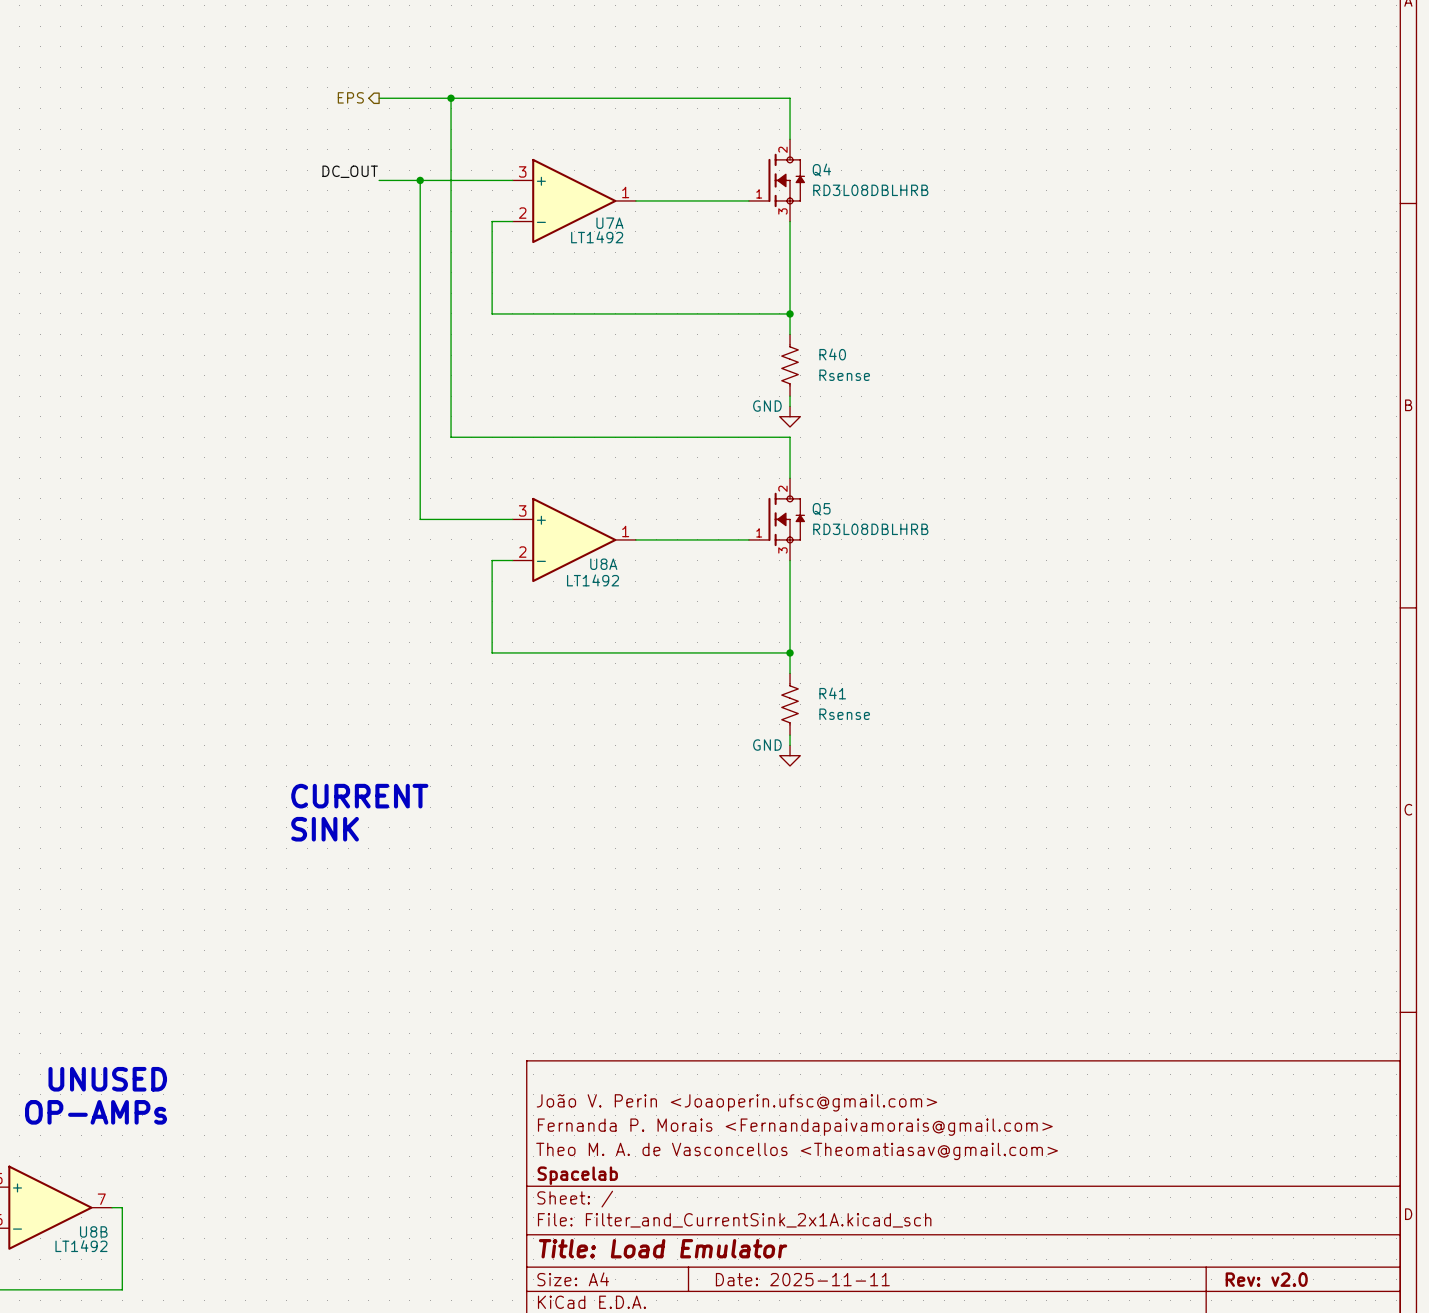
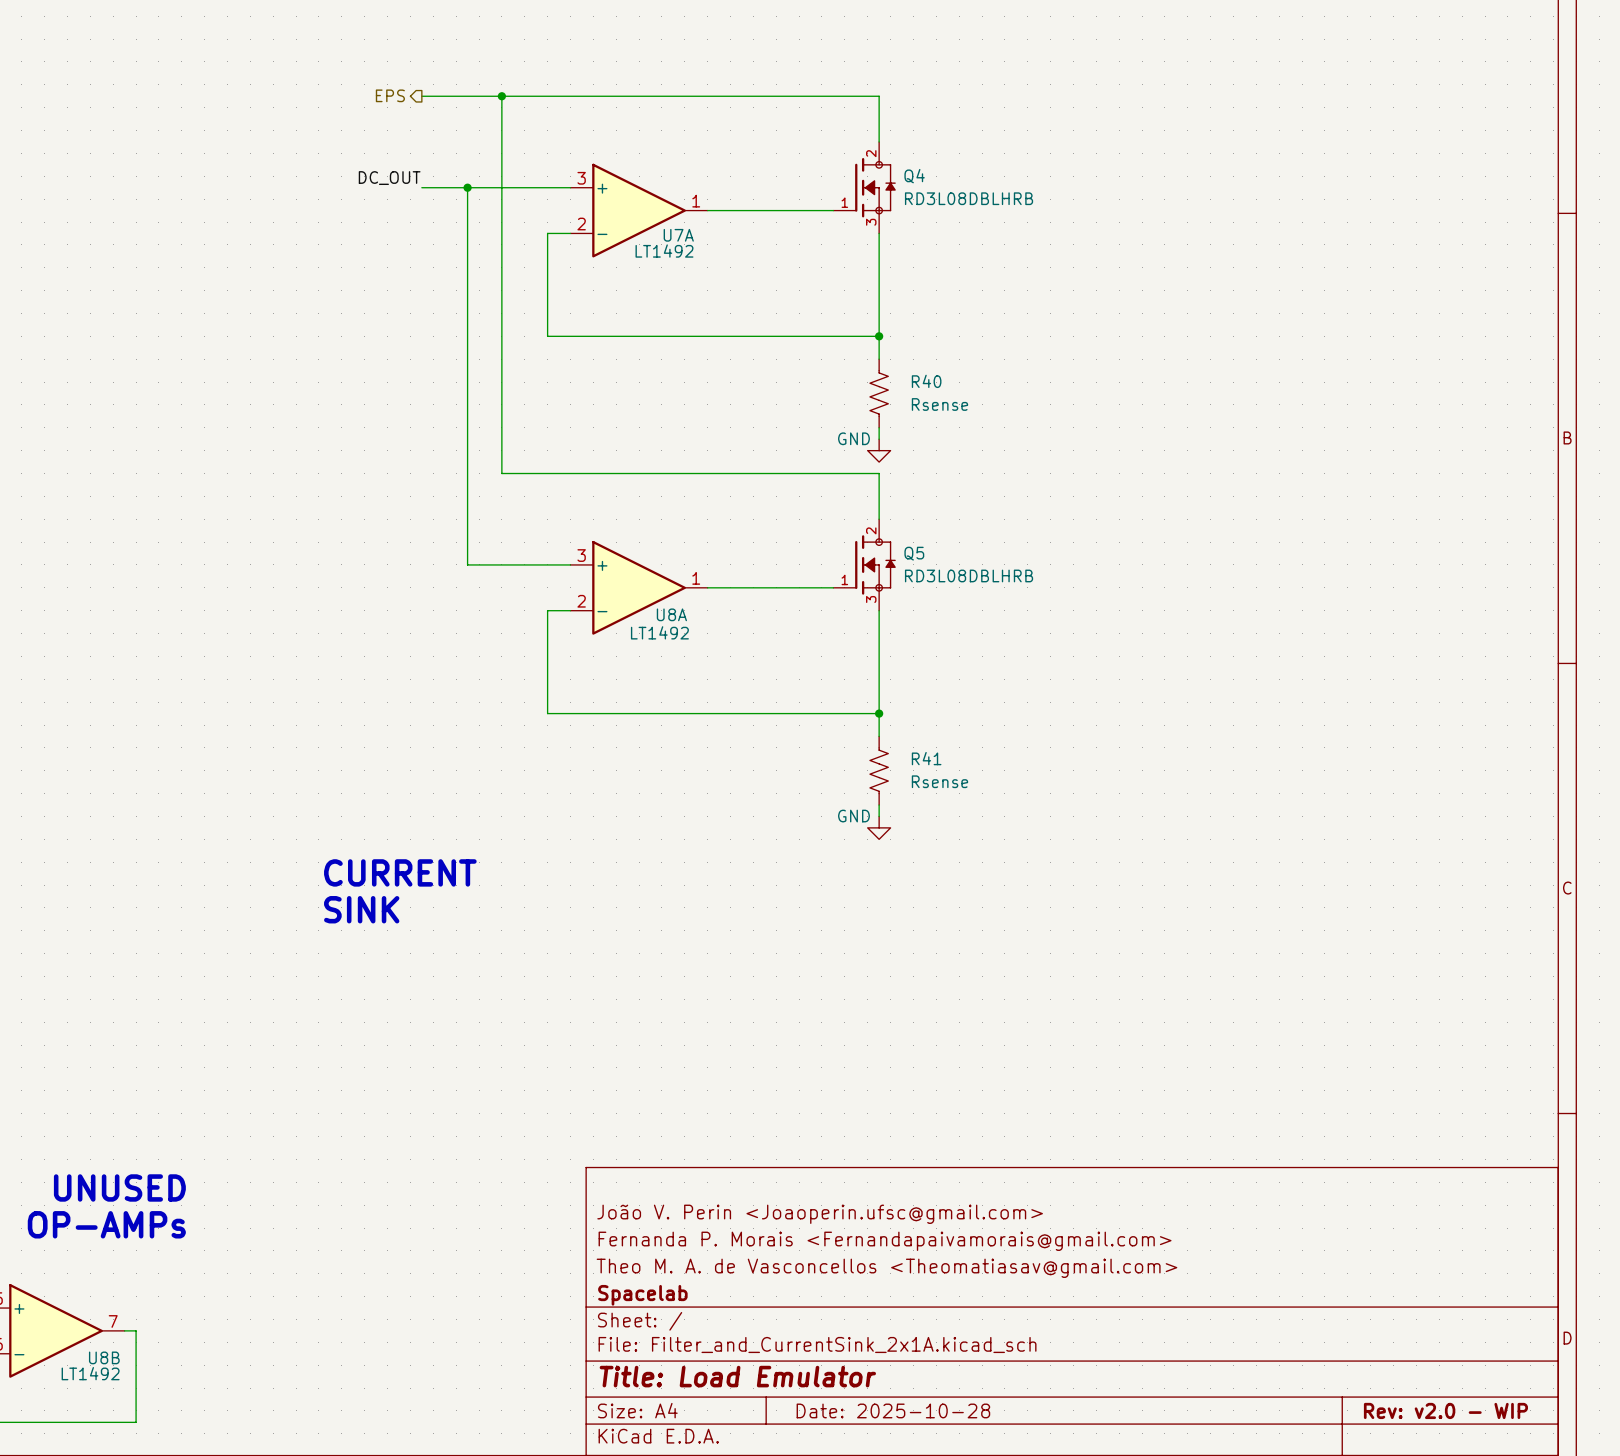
title block: Date: 2025-11-11 (802, 1279) -> Date: 2025-10-28 (893, 1410)
title block: Rev: v2.0 (1266, 1279) -> Rev: v2.0 - WIP (1445, 1410)

